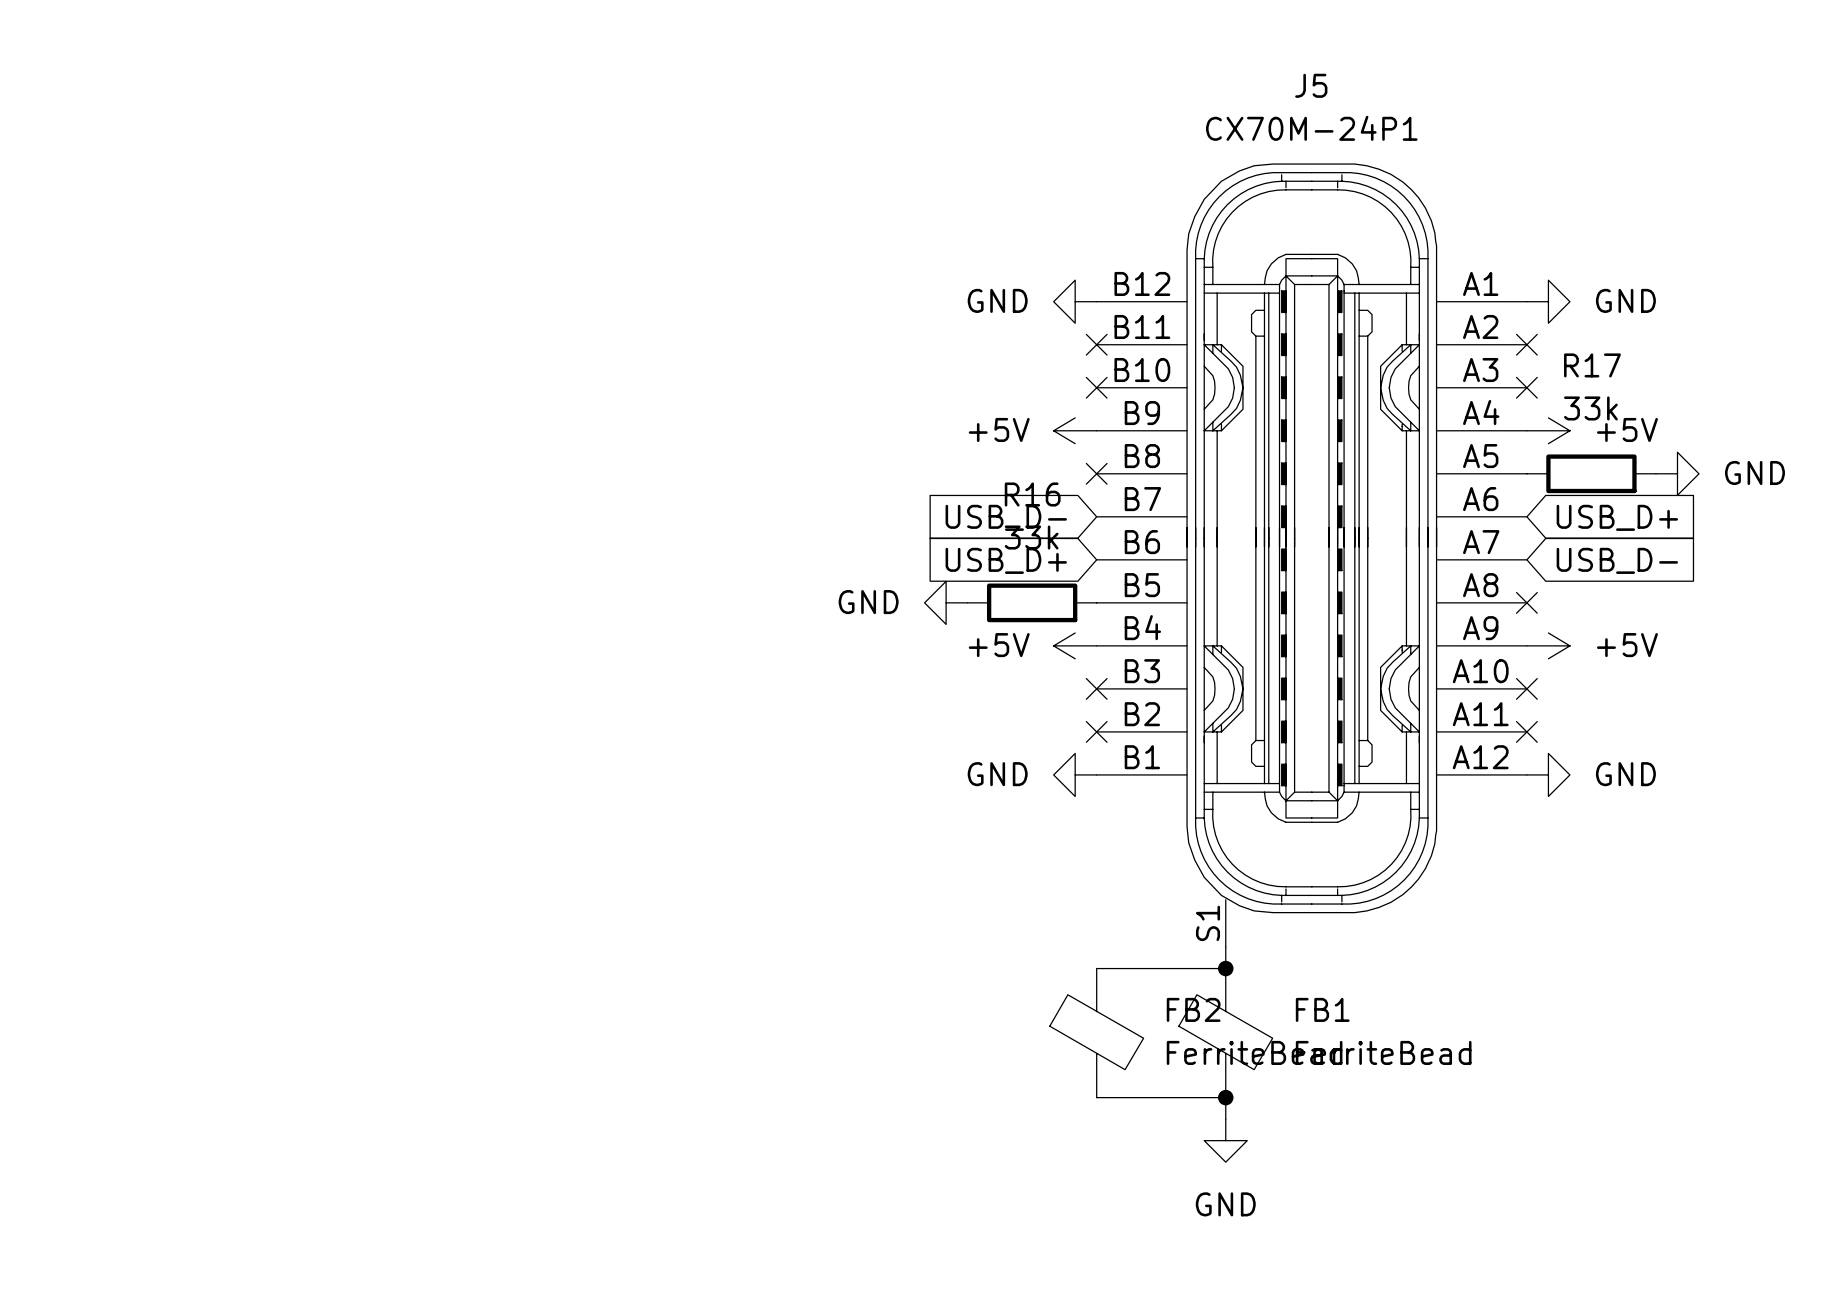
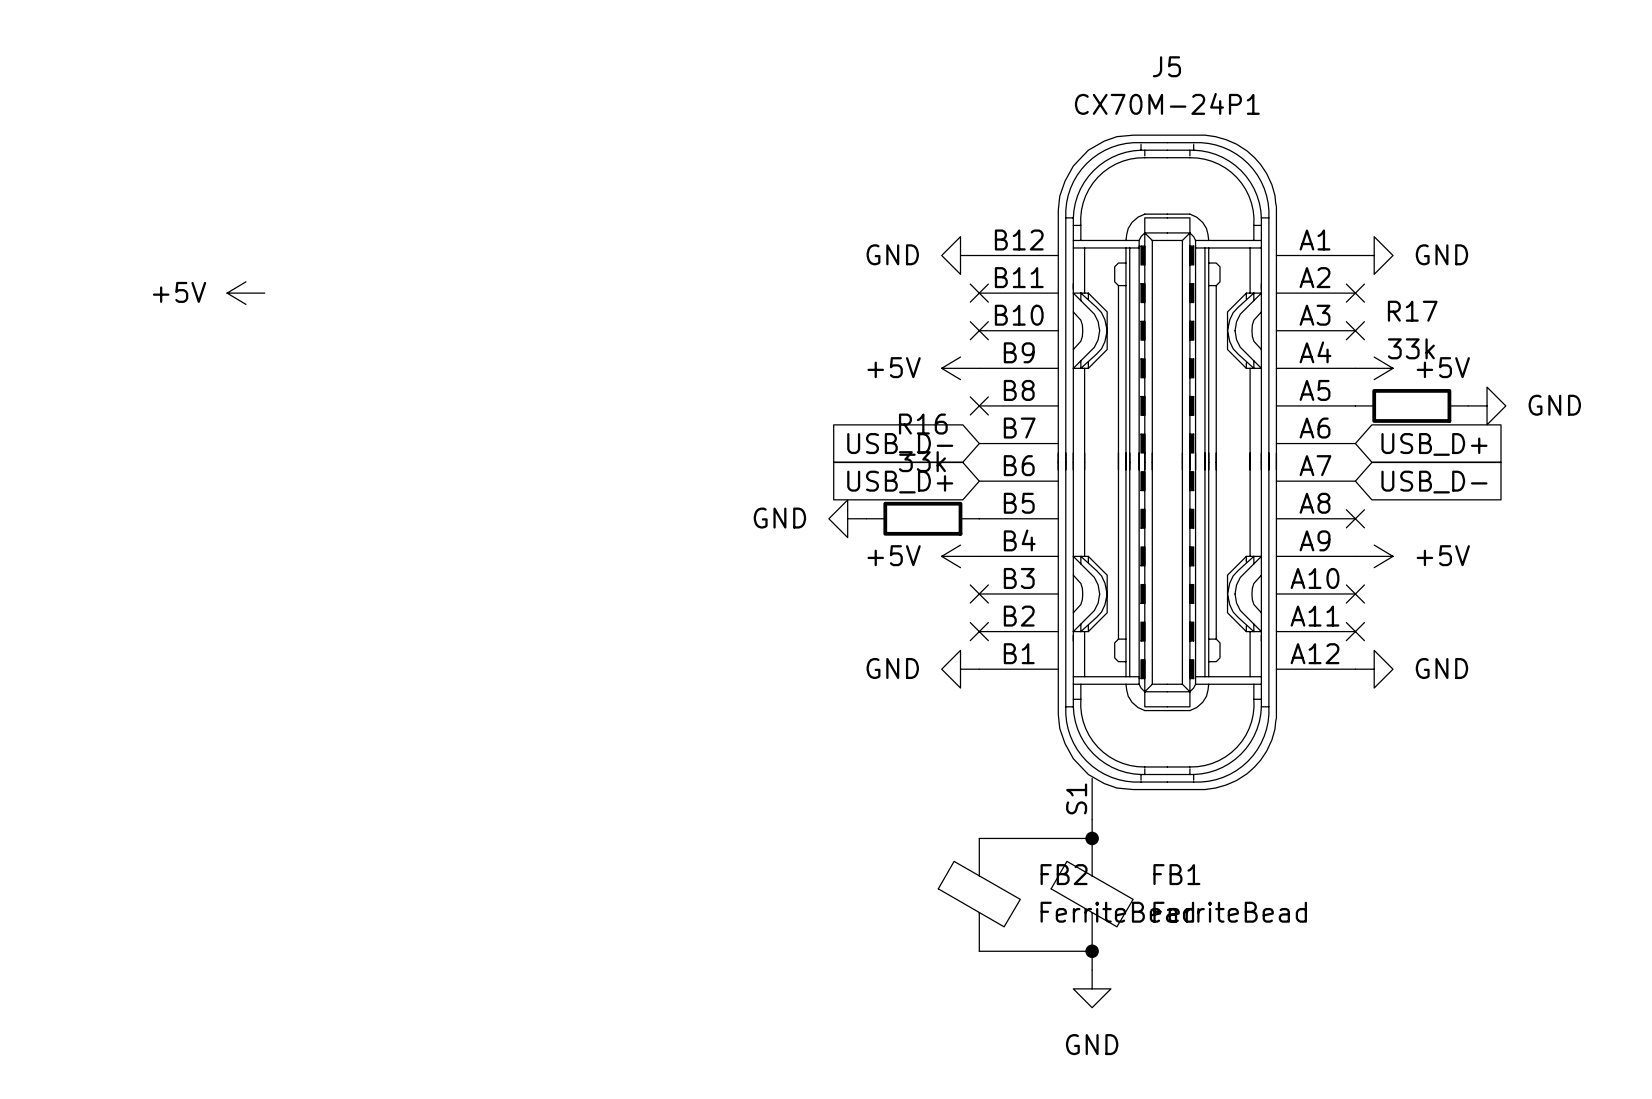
power symbol: none -> +5V (245, 293)

